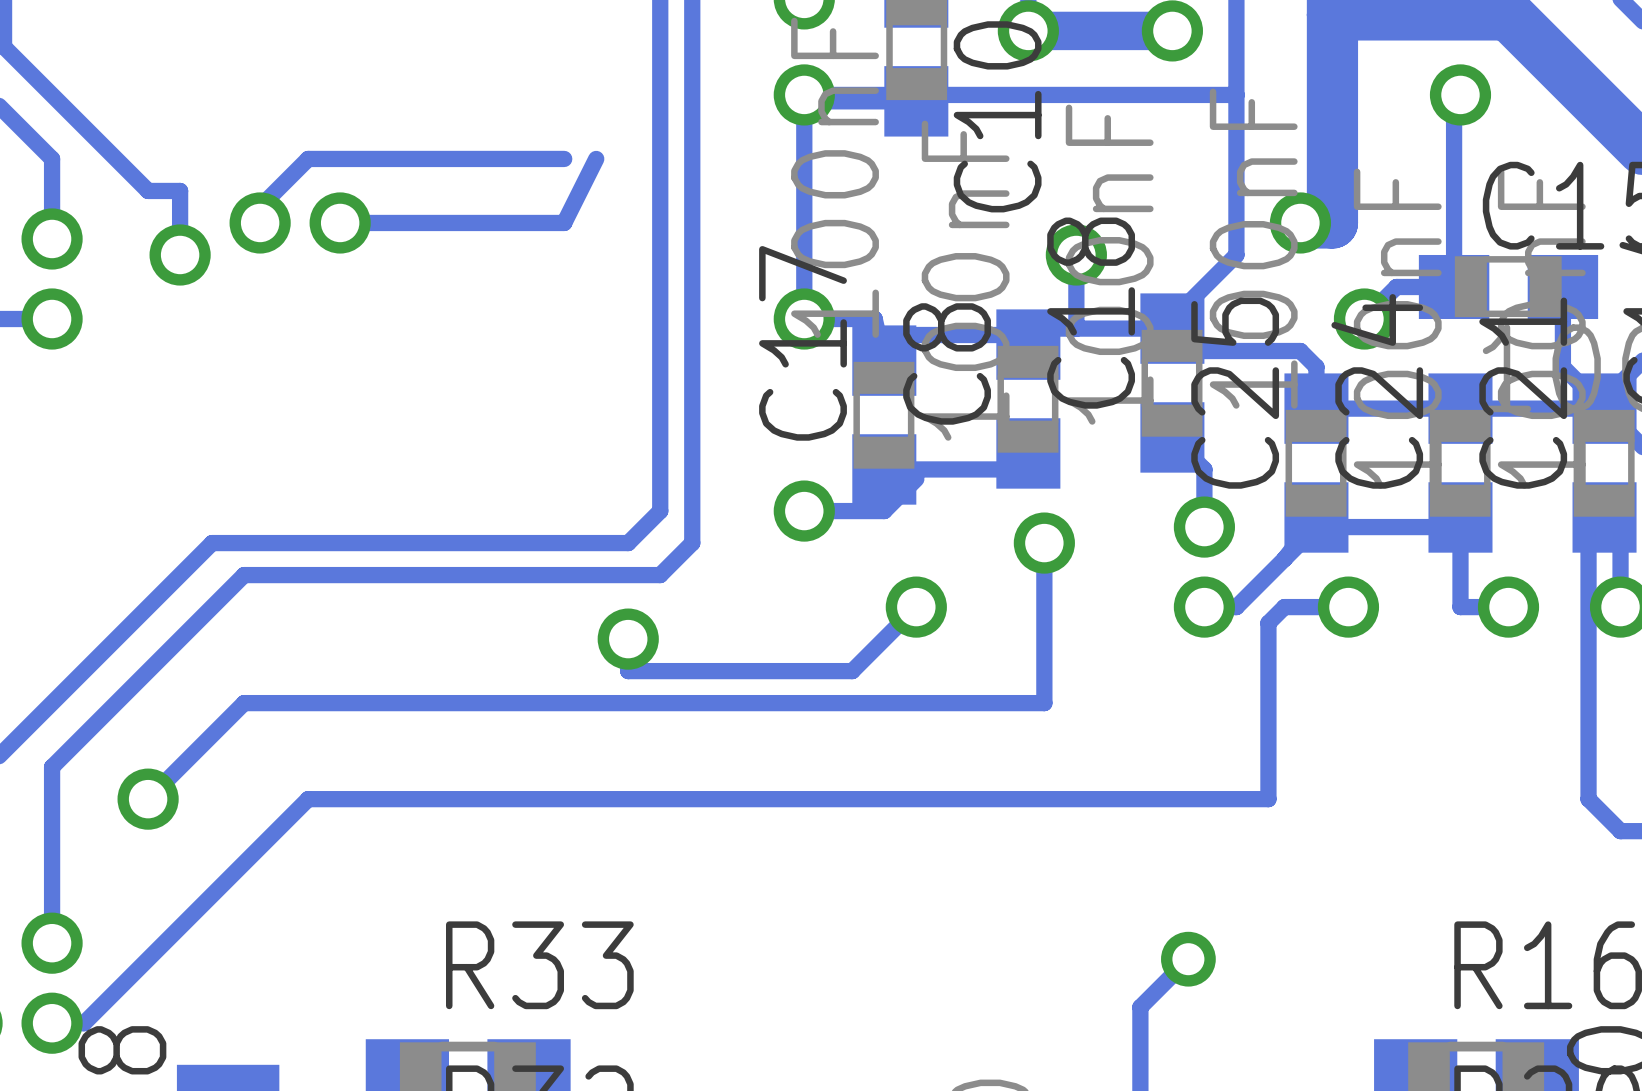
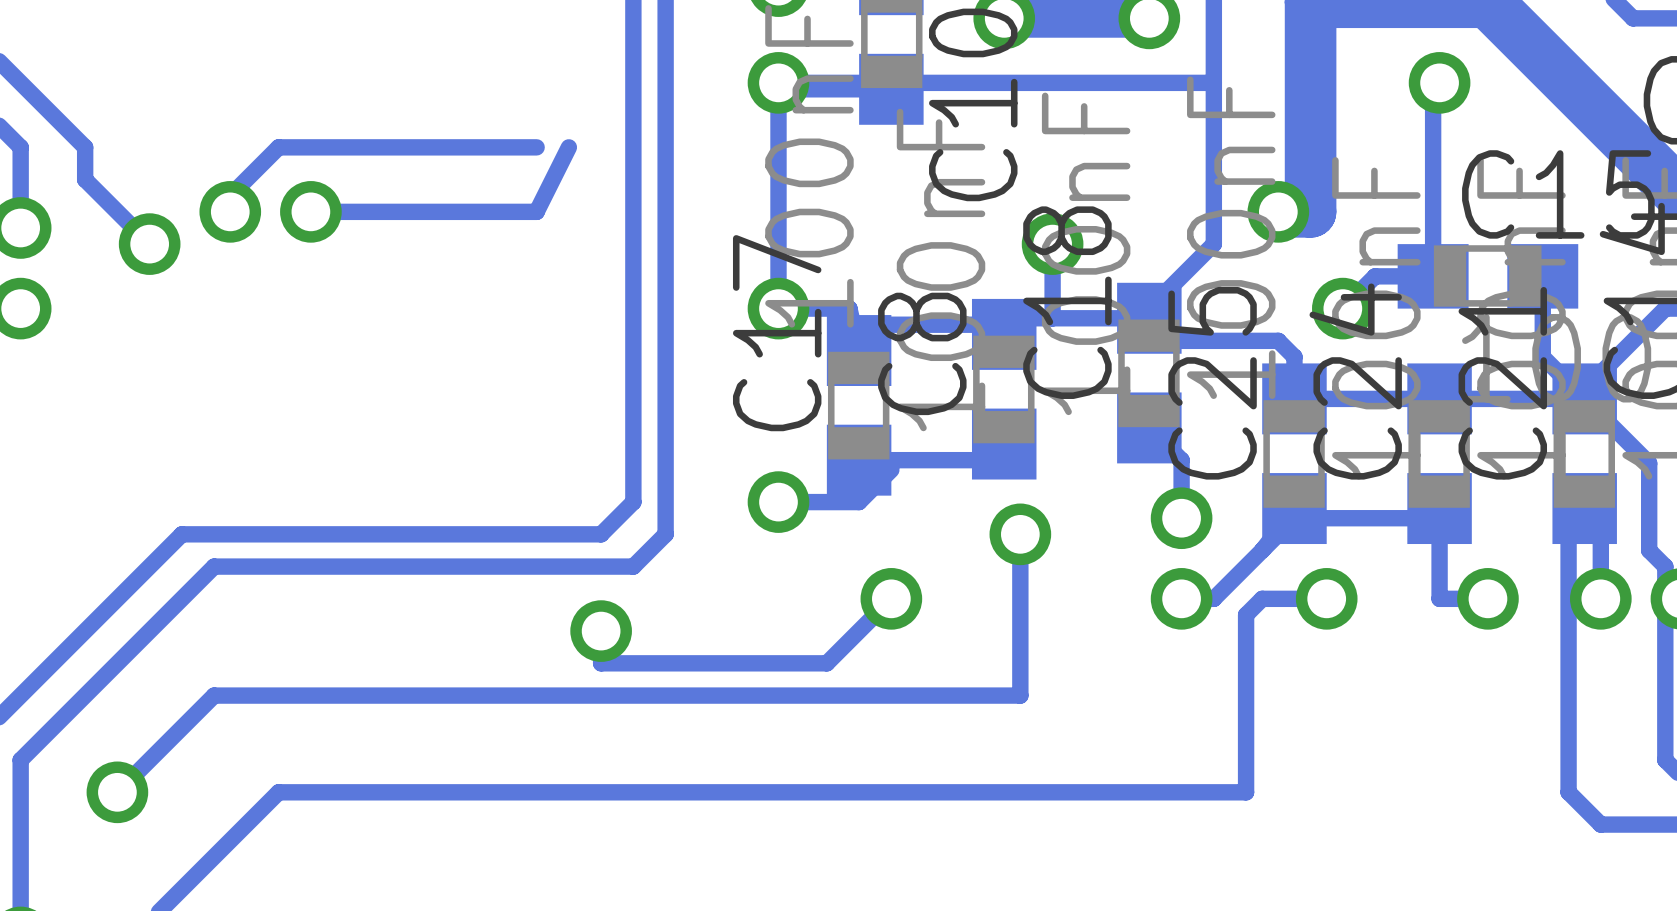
track: (116, 158) (148, 190) (180, 190) (180, 254) -> (85, 147) (85, 179) (149, 244)

